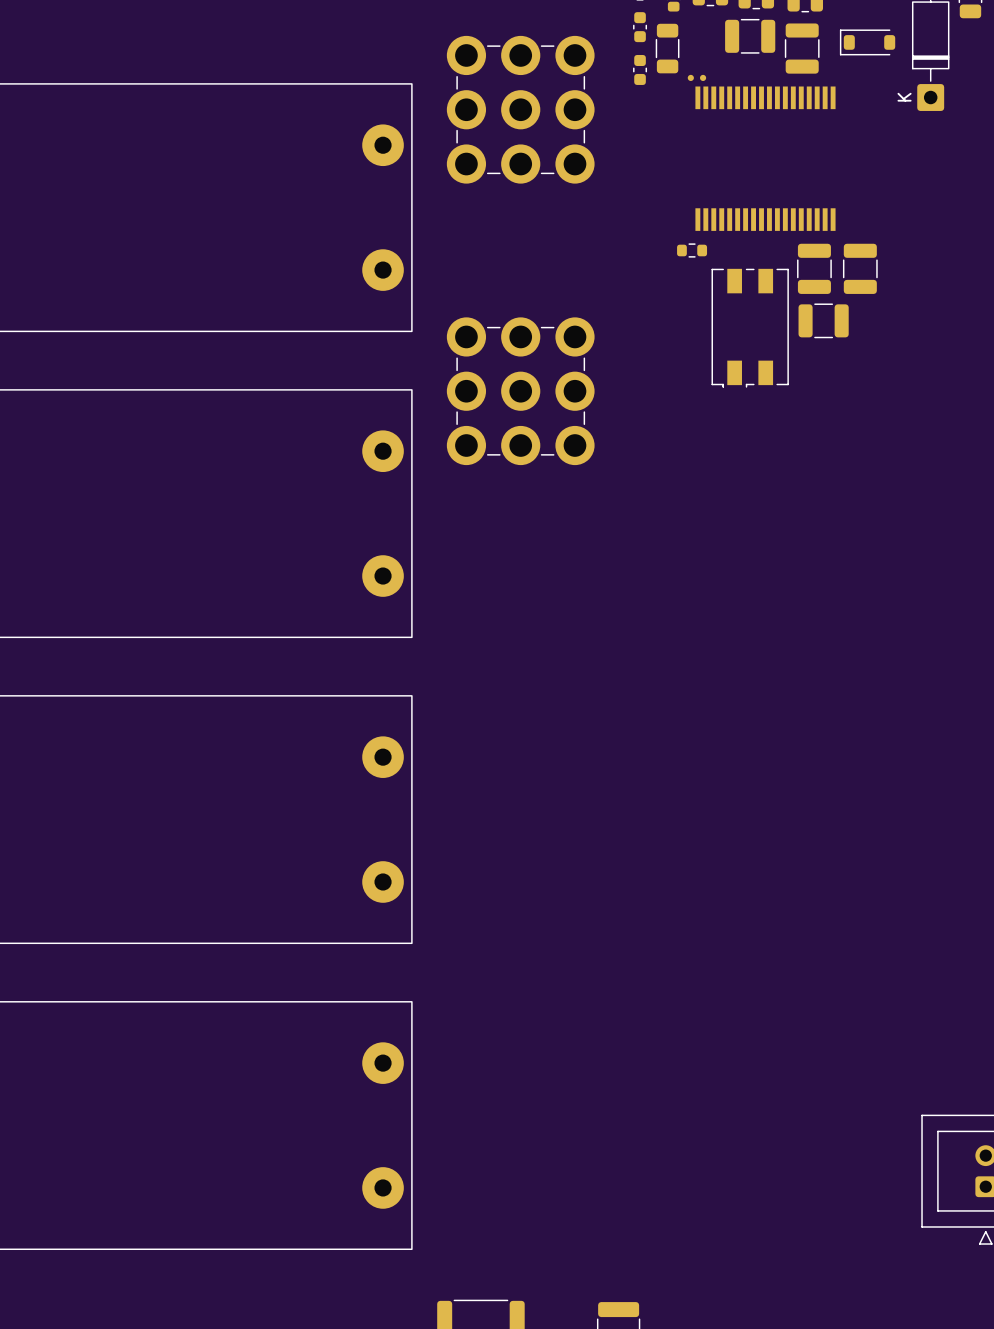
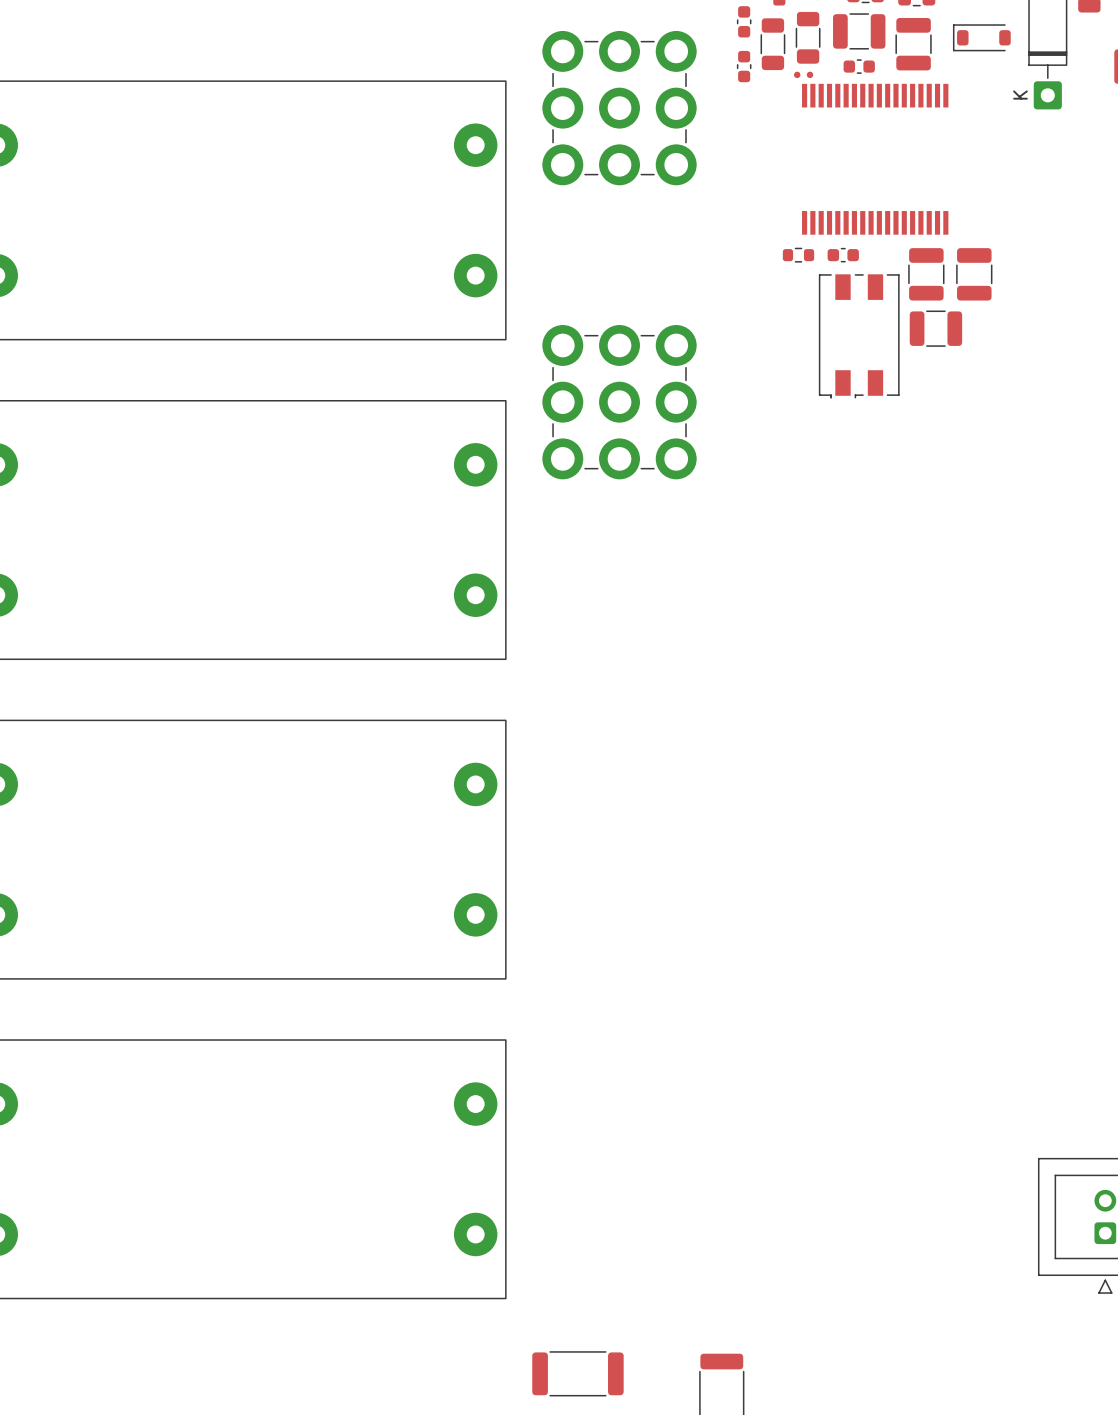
part: none -> (808, 37)
part: none -> (859, 66)
part: none -> (843, 255)

